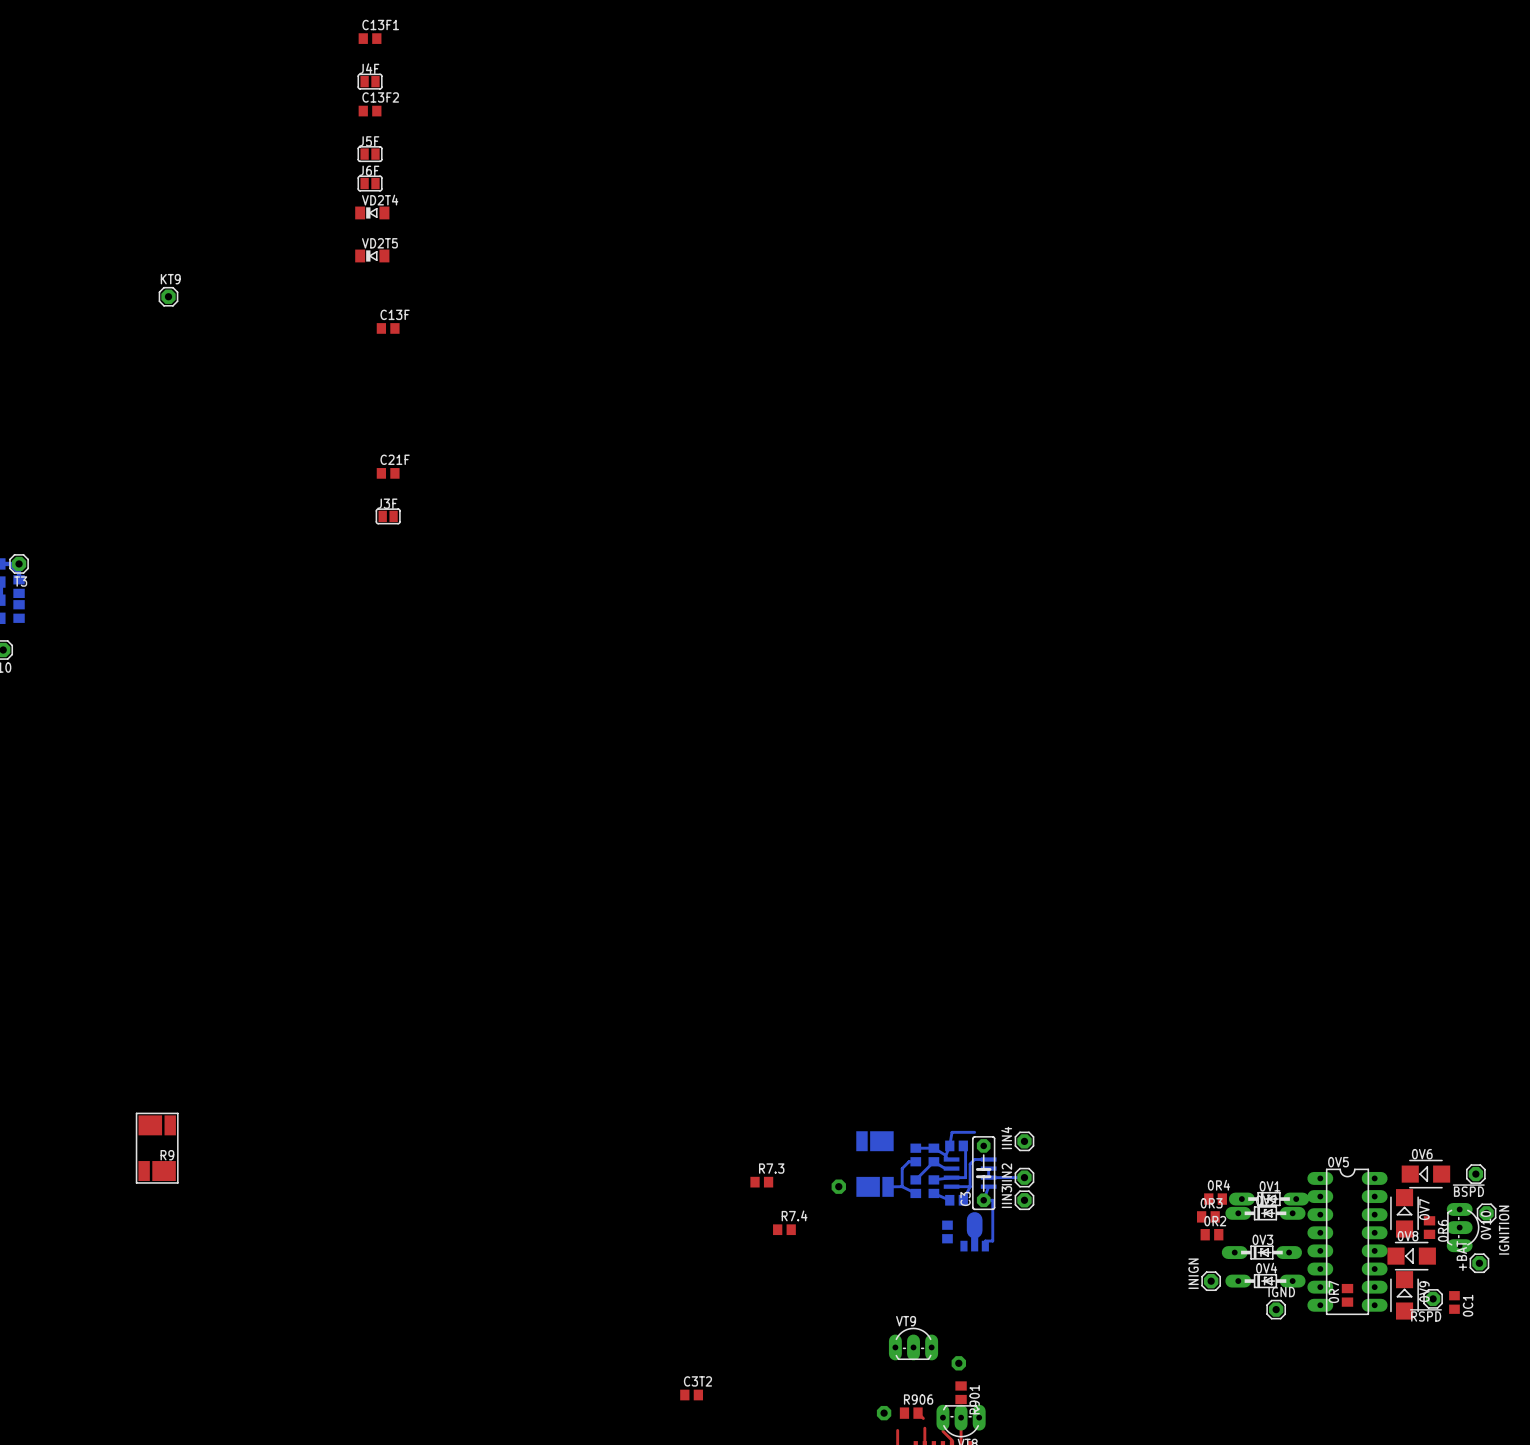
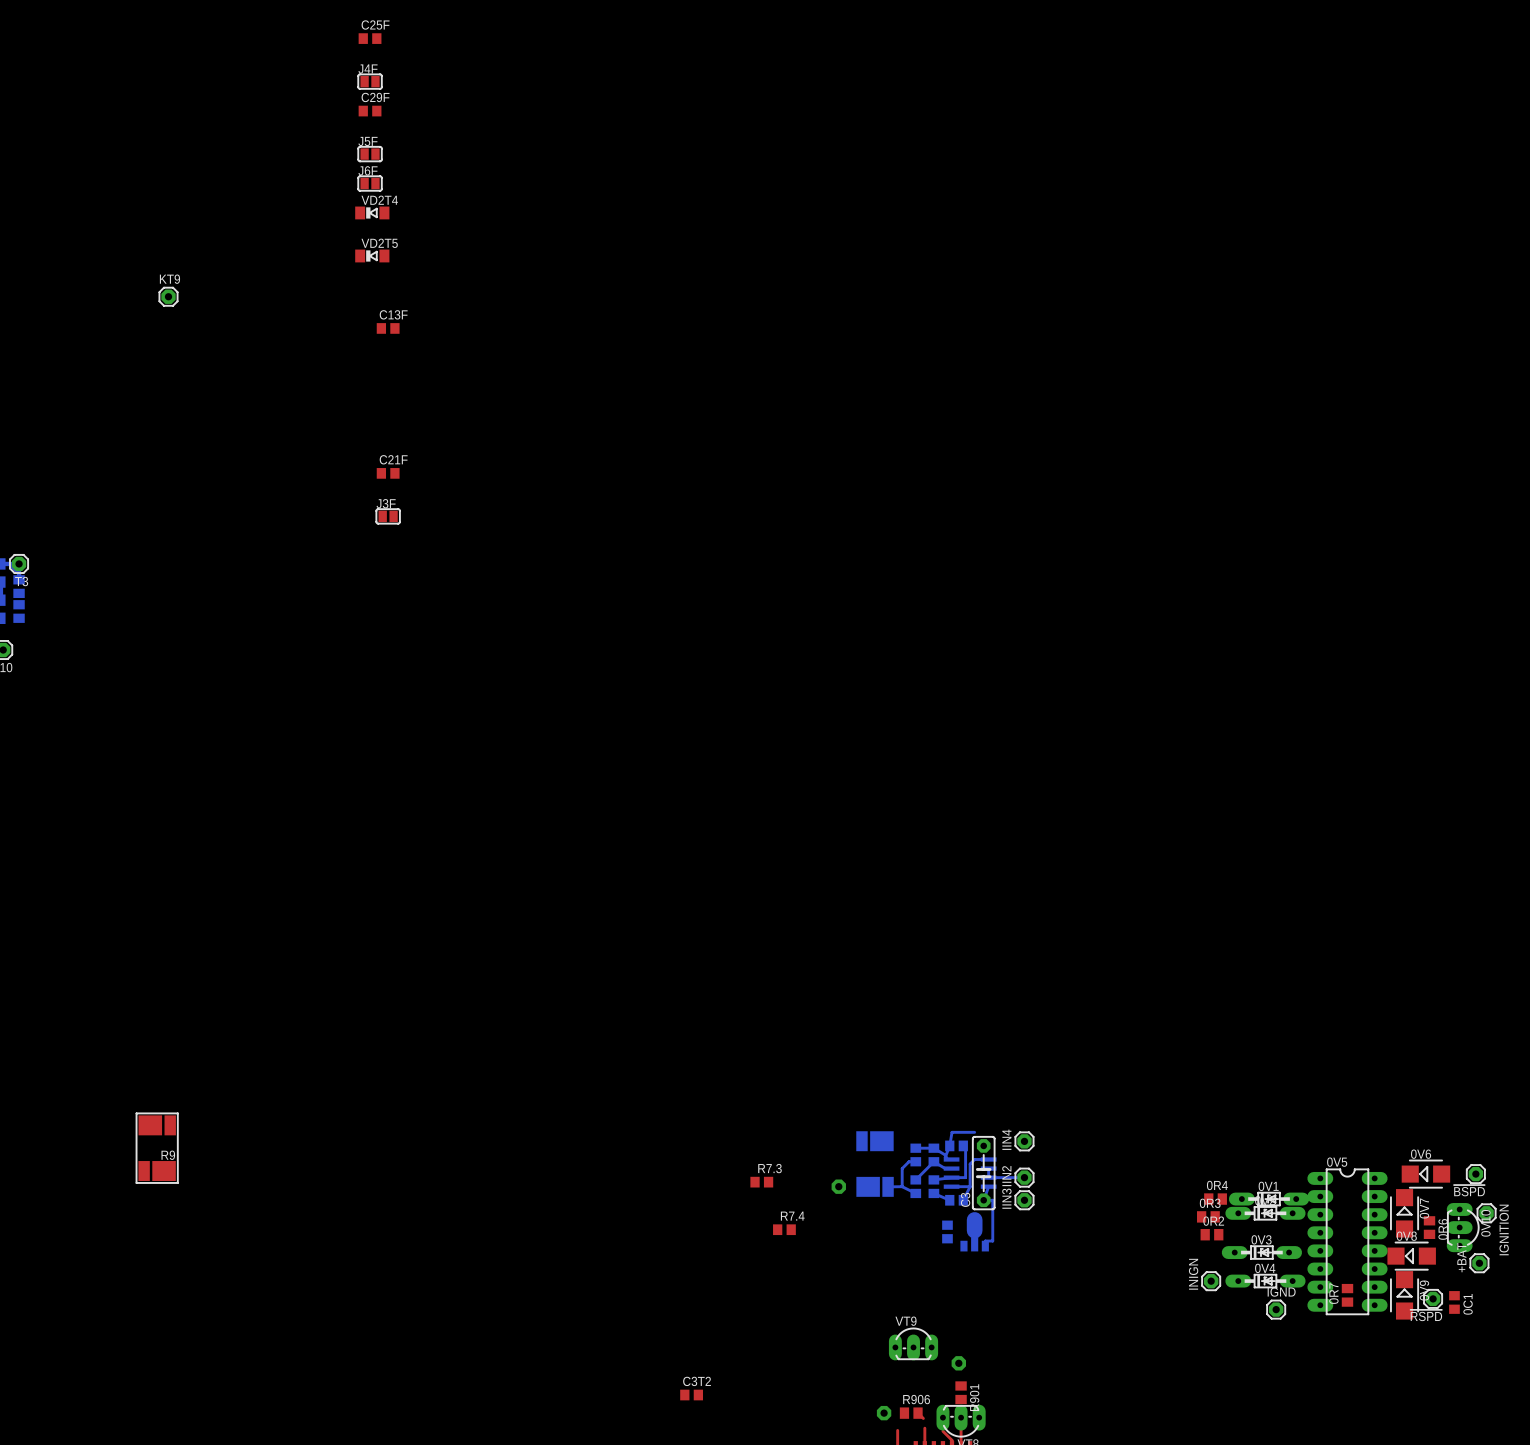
C13F1 name: C13F1 (380, 25) -> C25F (375, 25)
C13F2 name: C13F2 (380, 97) -> C29F (375, 97)

